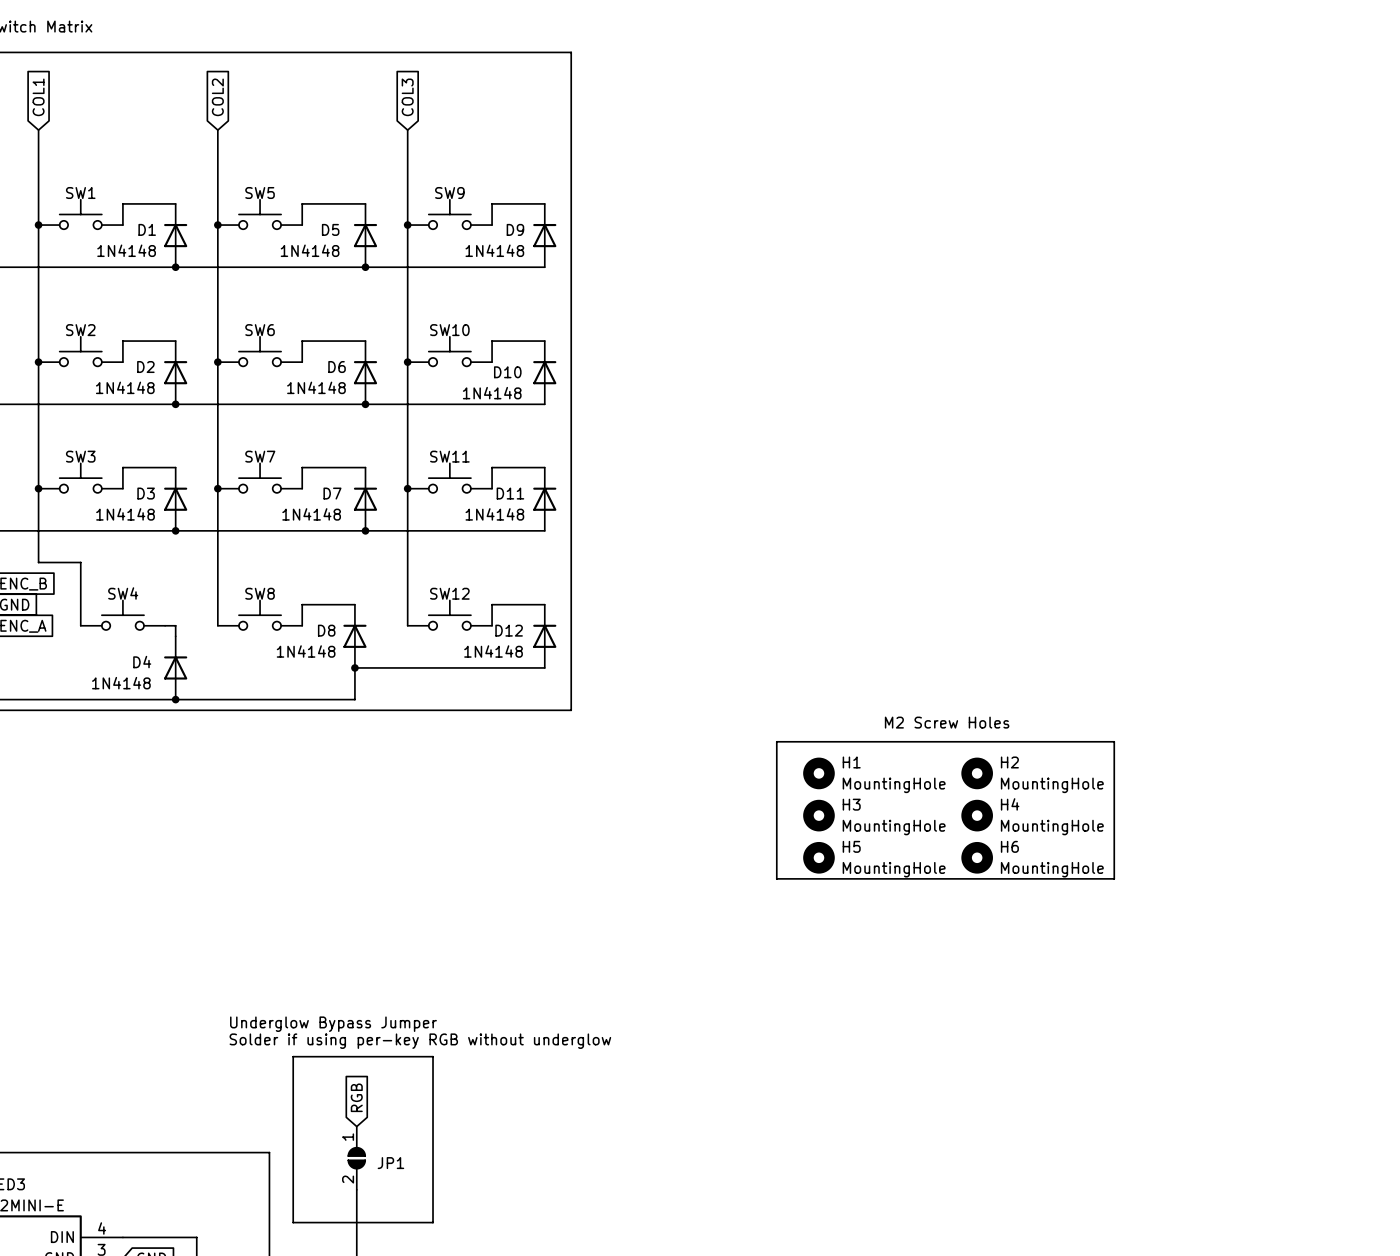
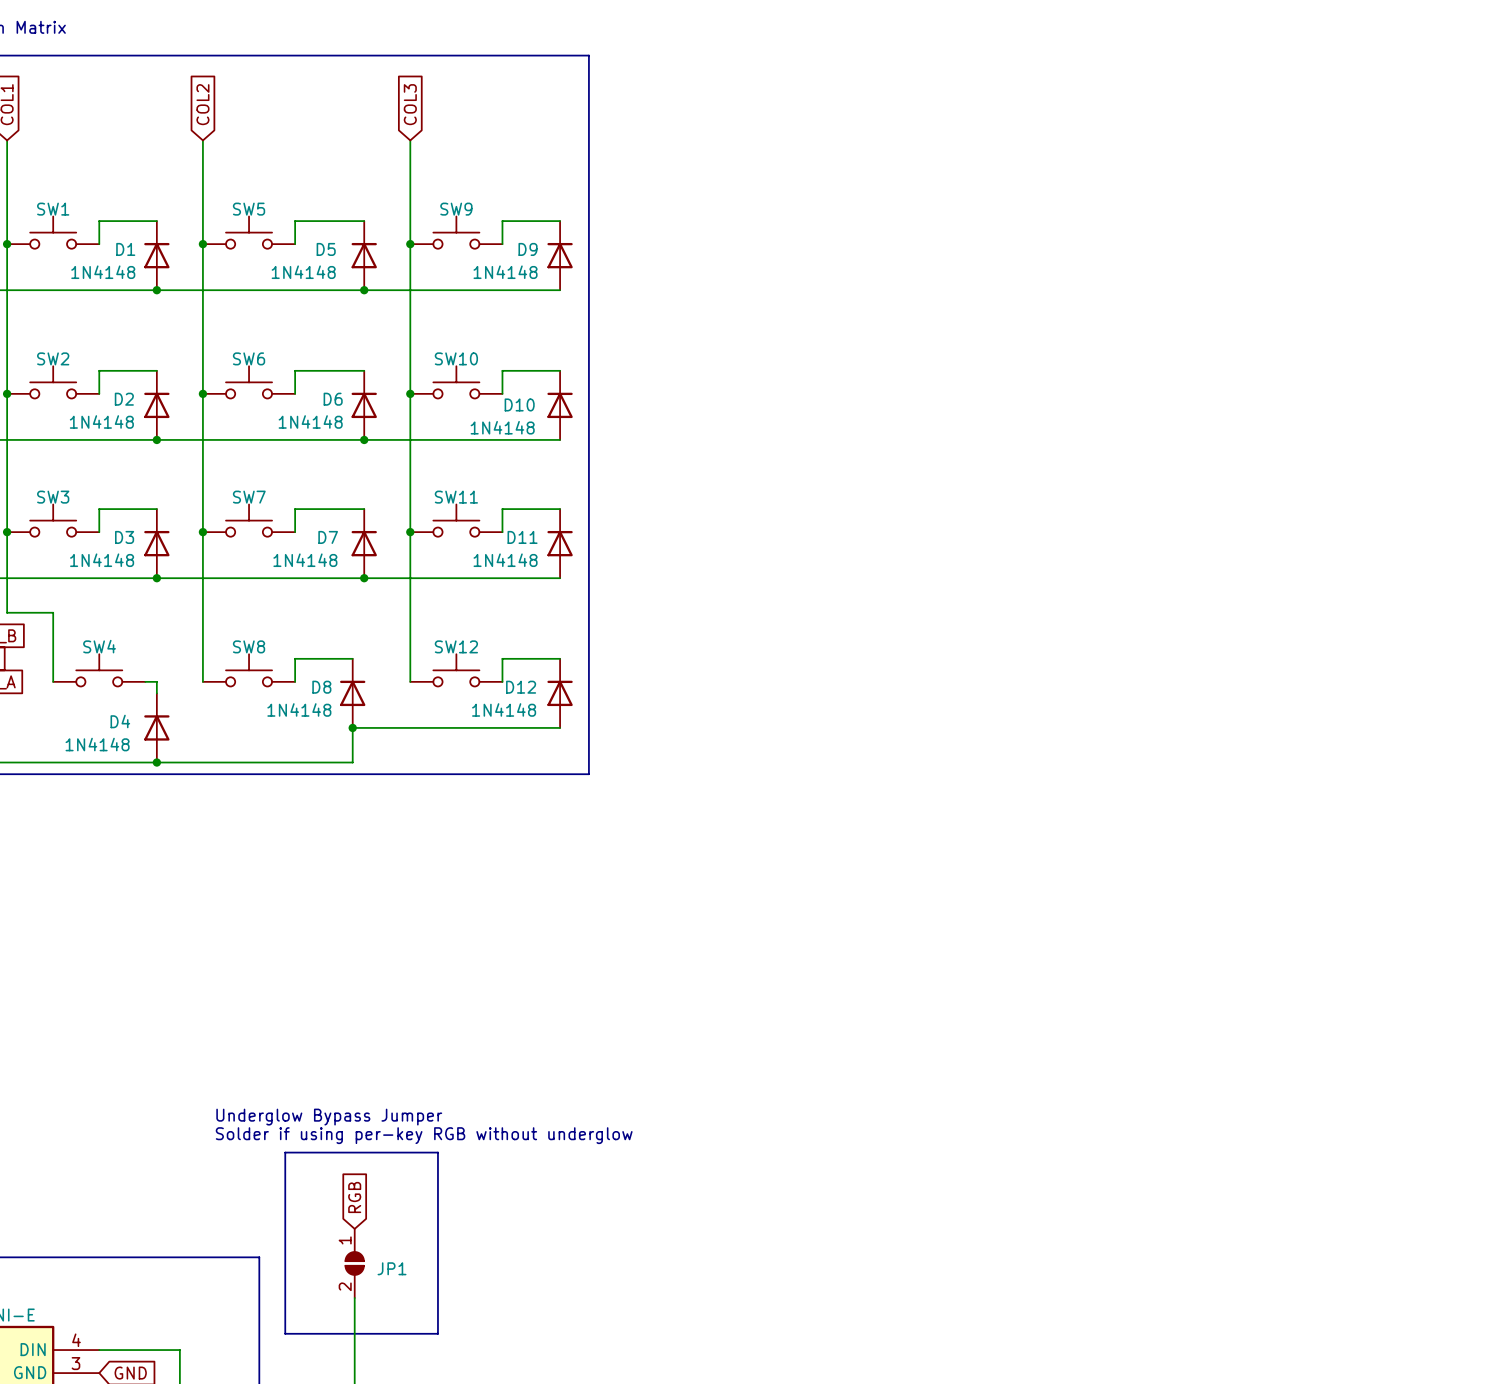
text: M2 Screw Holes (947, 722) -> none
line: (776, 741) (1114, 741) (1114, 878) (776, 878) (776, 741) -> none
H1: MountingHole (818, 773) -> none
H2: MountingHole (977, 773) -> none
H3: MountingHole (818, 815) -> none
H4: MountingHole (977, 815) -> none
H5: MountingHole (818, 857) -> none
H6: MountingHole (977, 857) -> none

